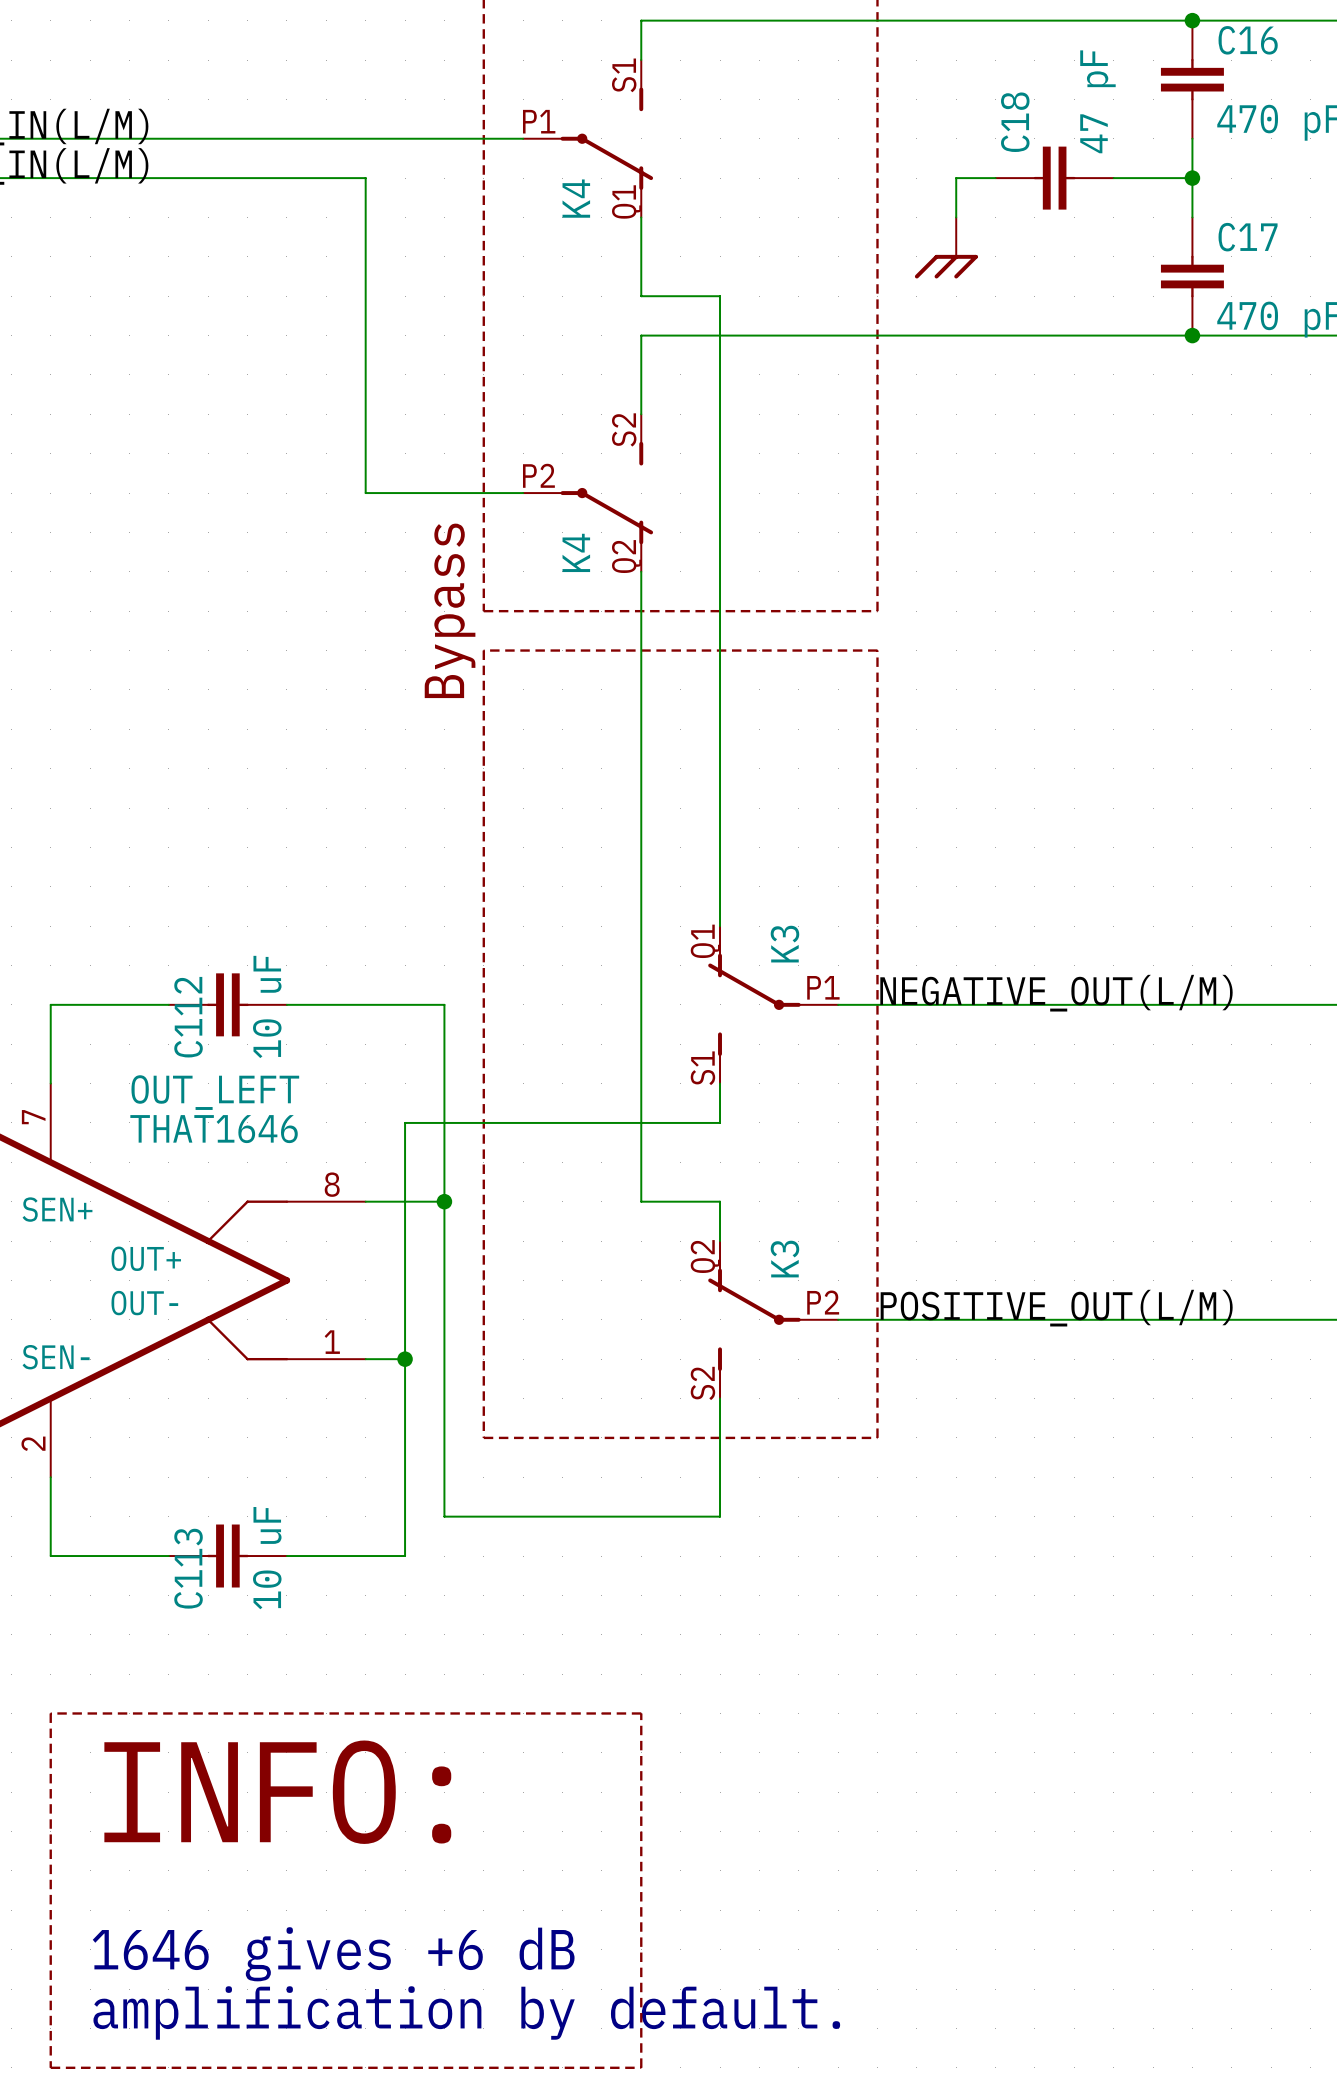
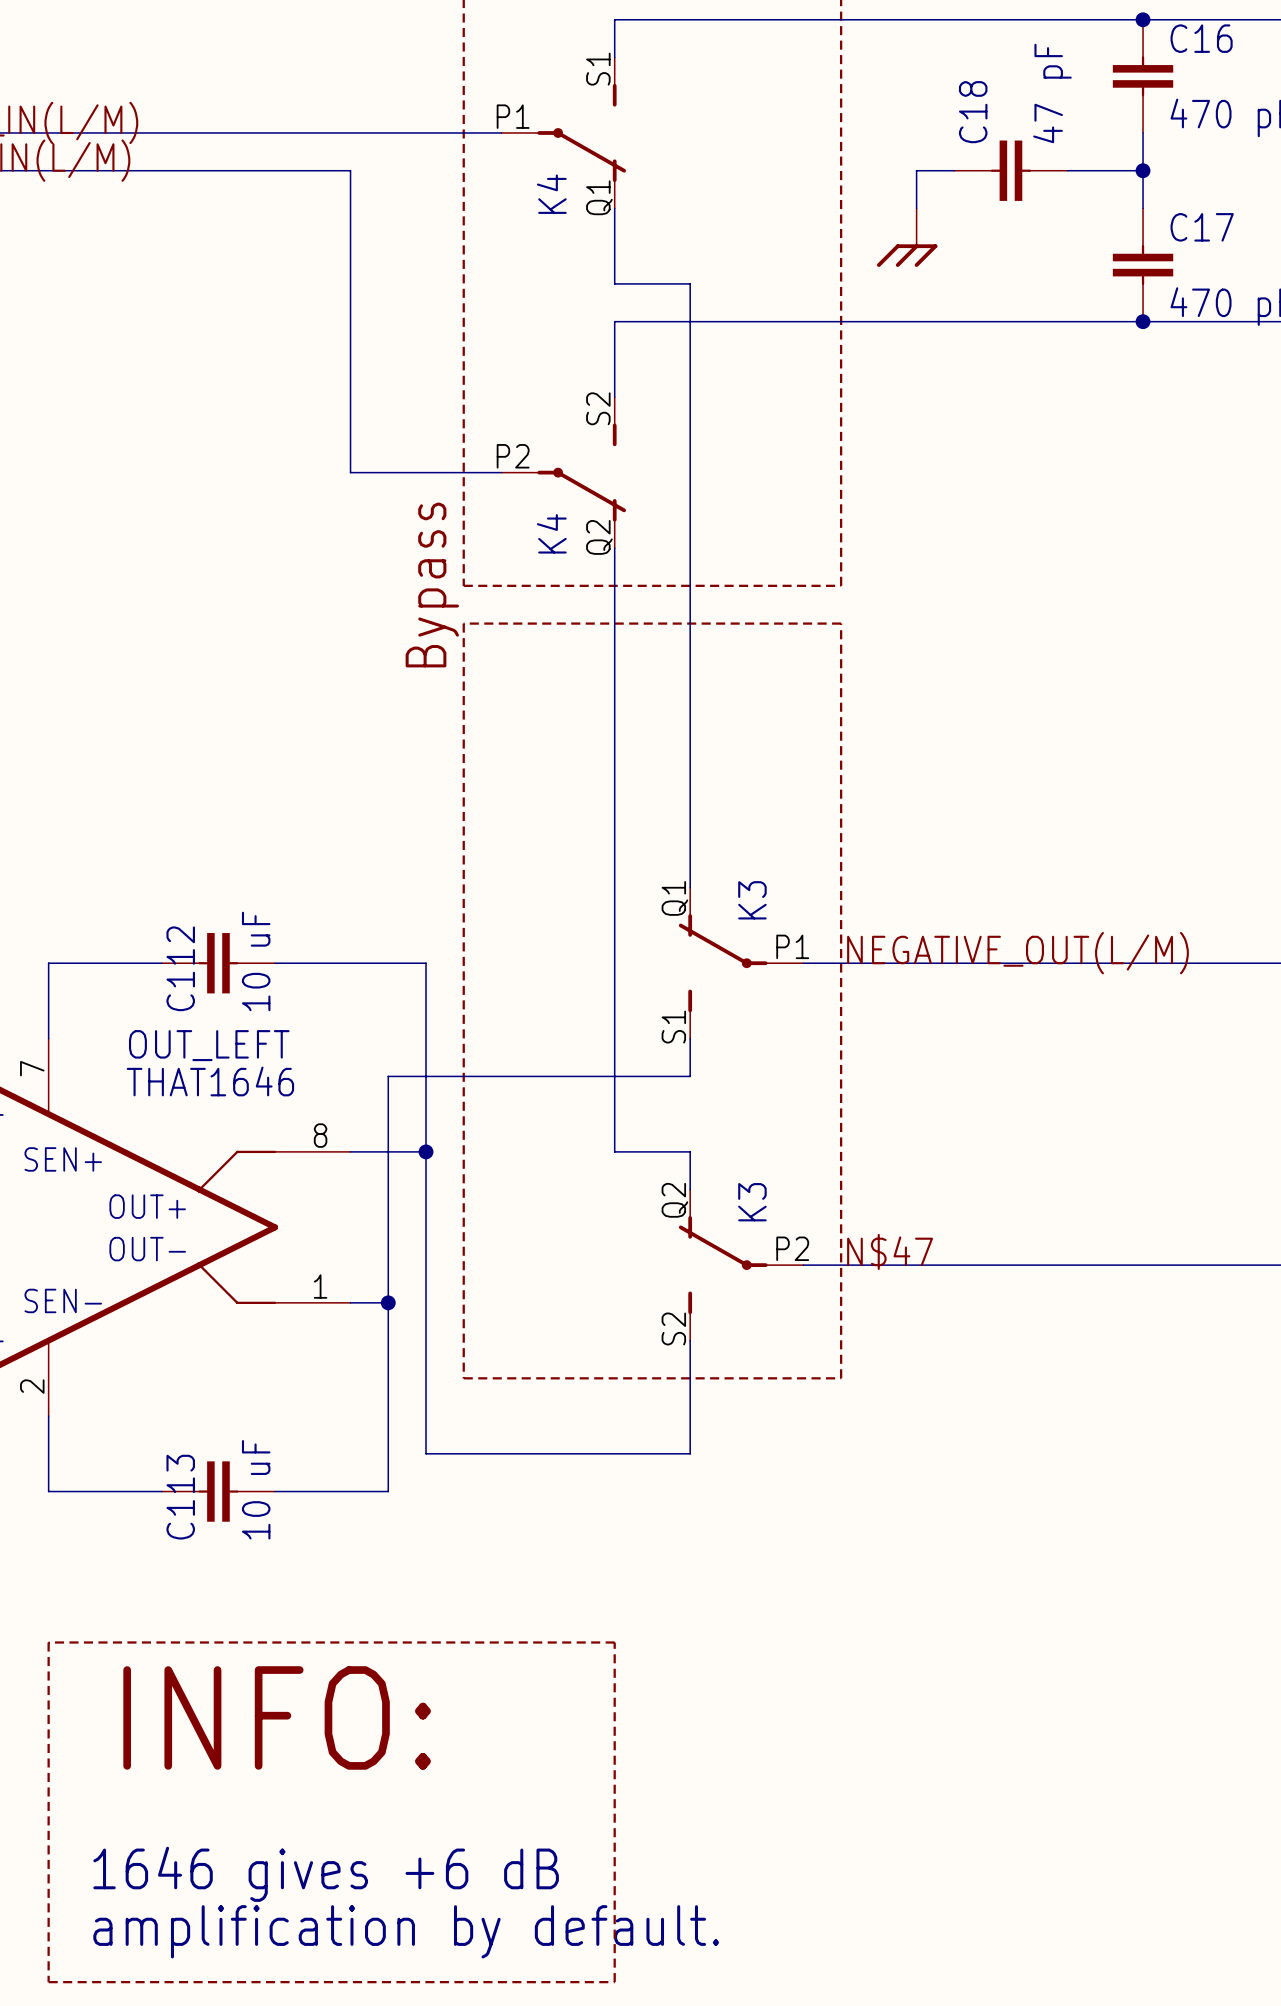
label: POSITIVE_OUT(L/M) (1056, 1308) -> N$47 (890, 1251)

